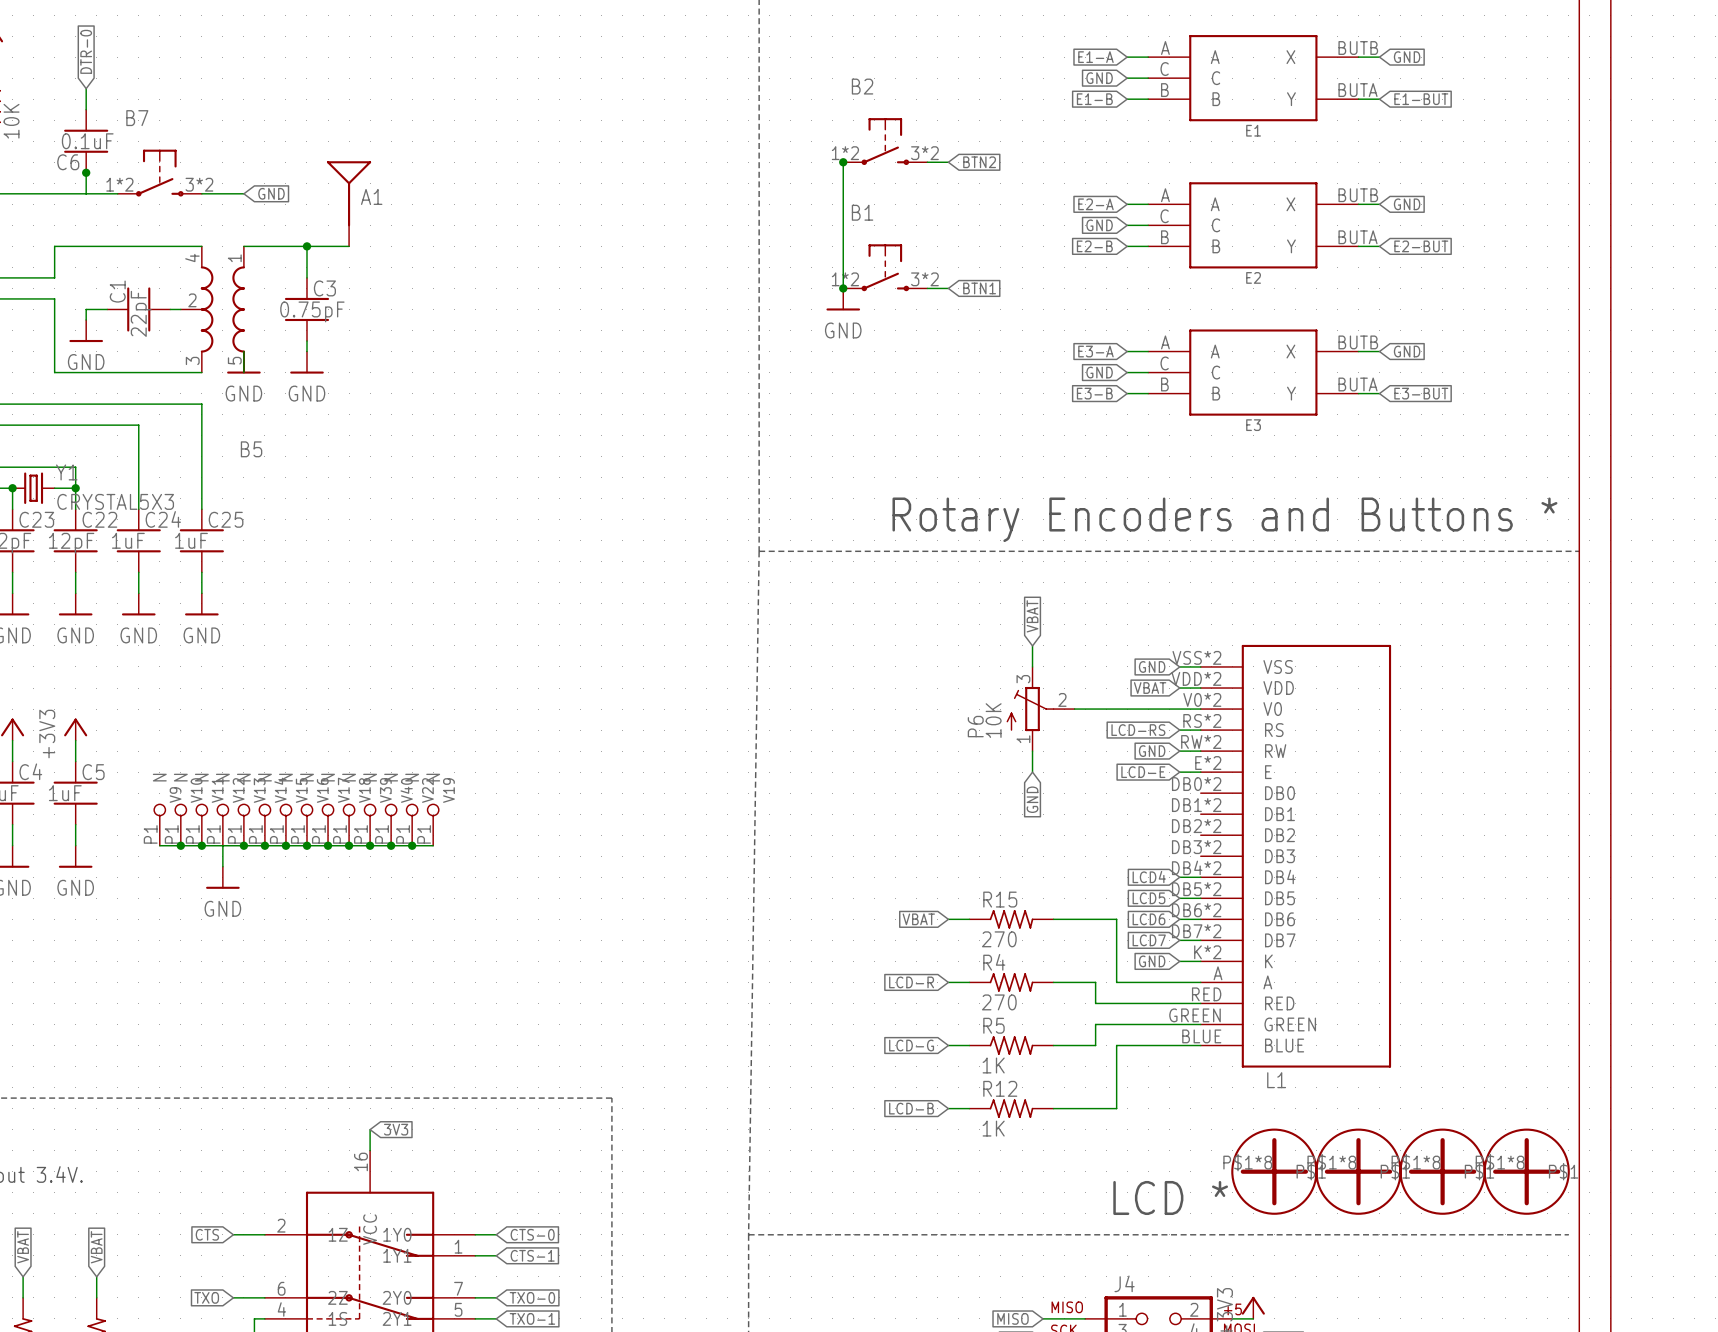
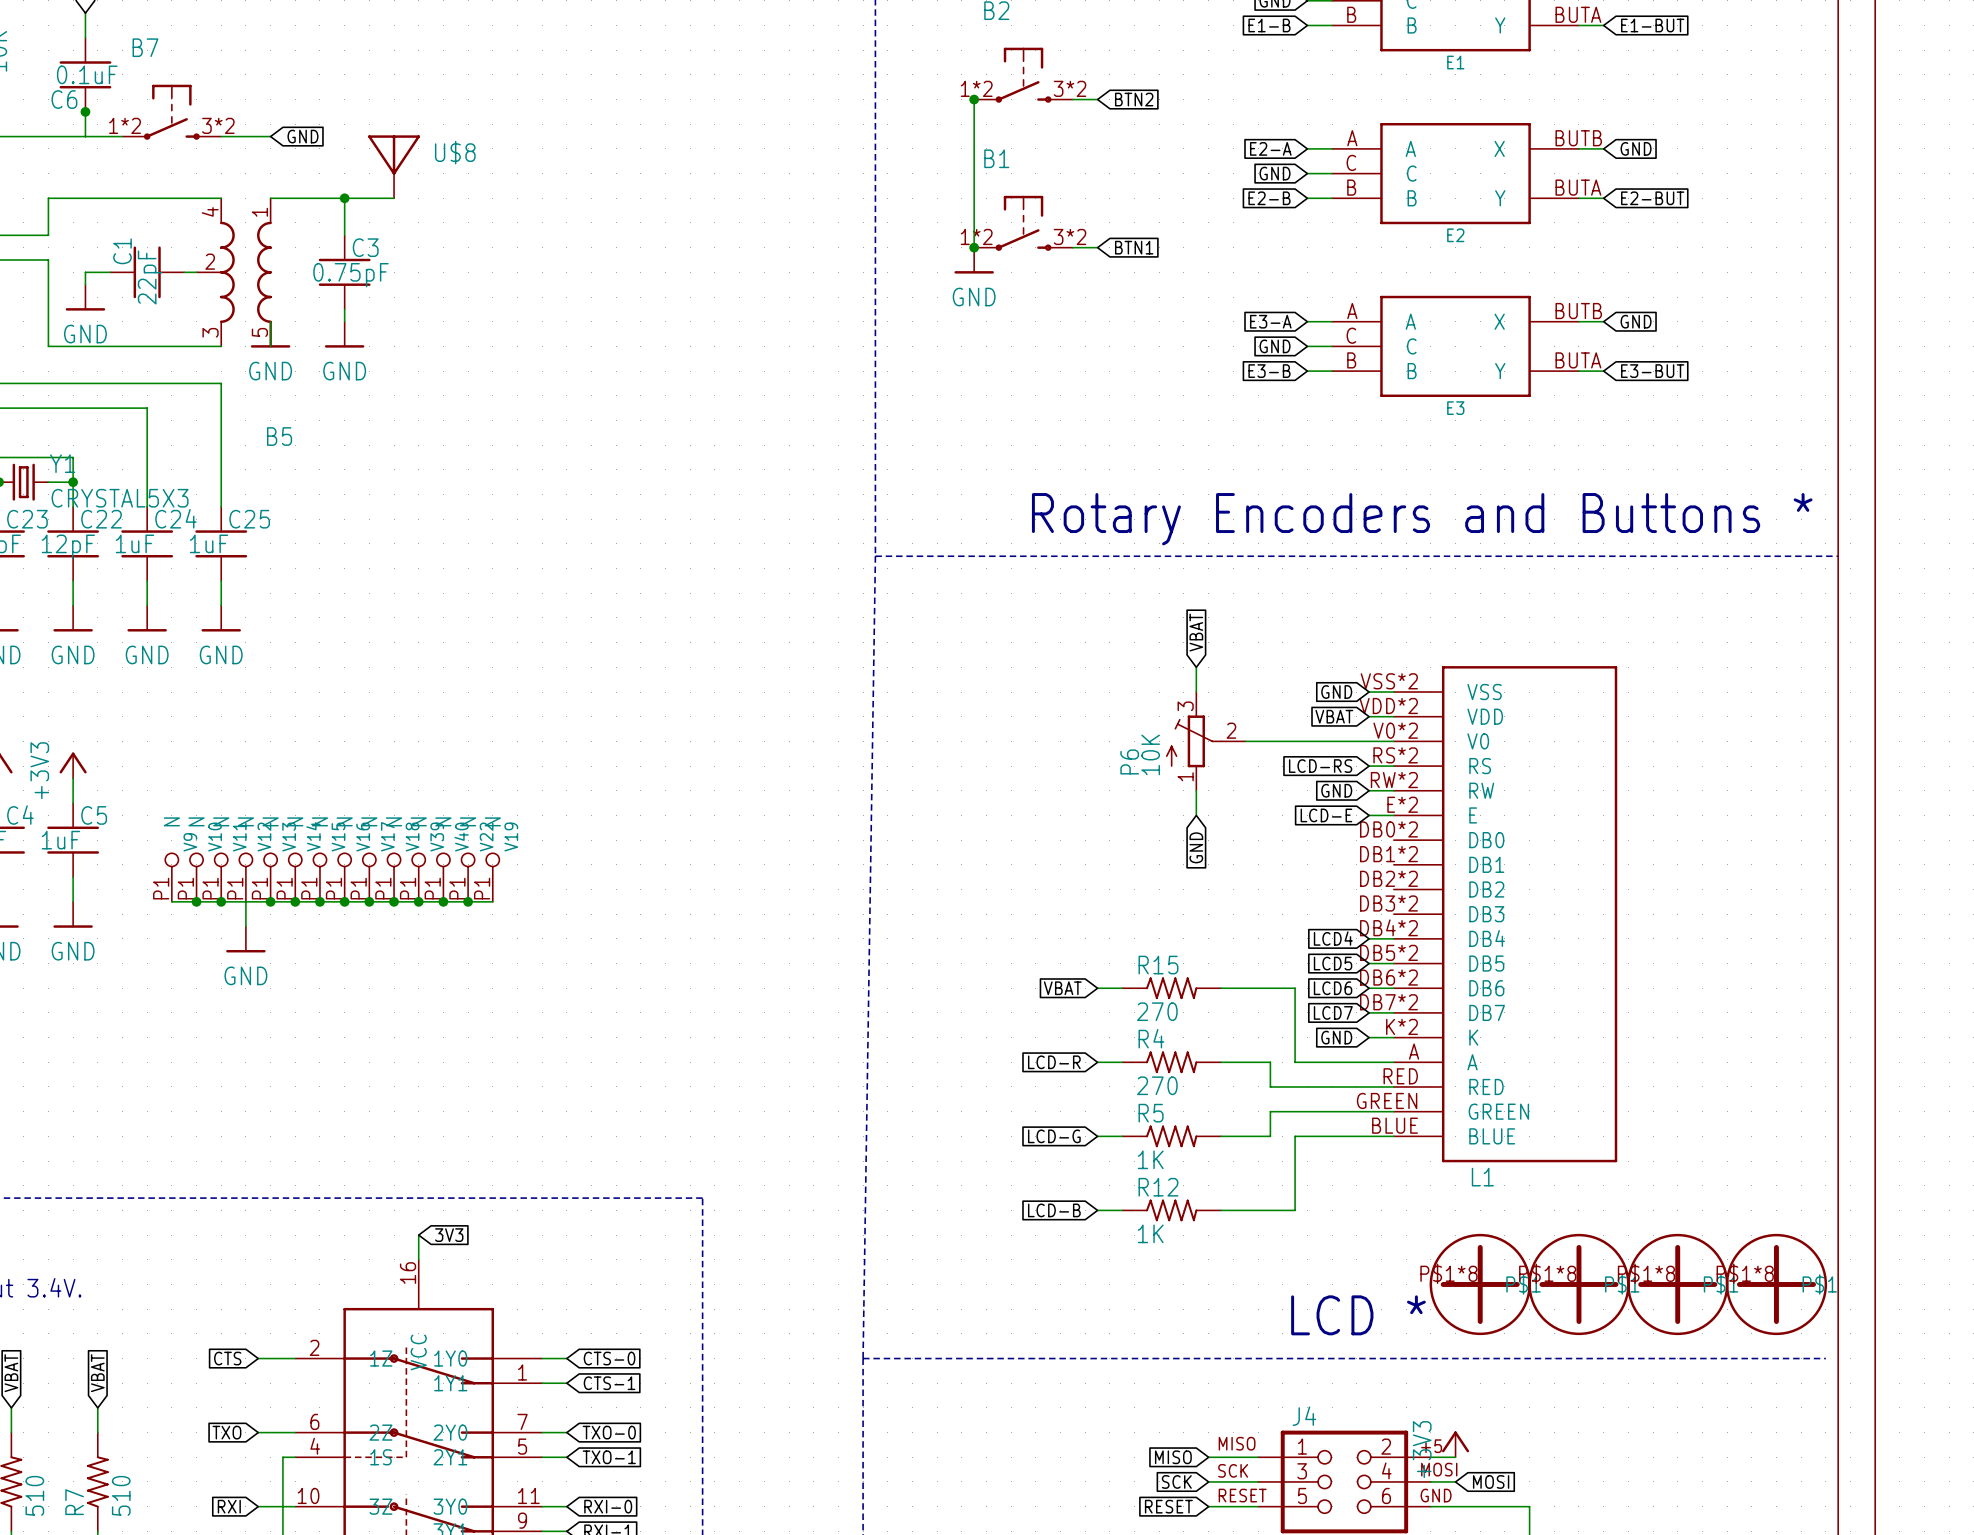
A1: (349, 203) -> none
U$8: none -> (394, 166)

